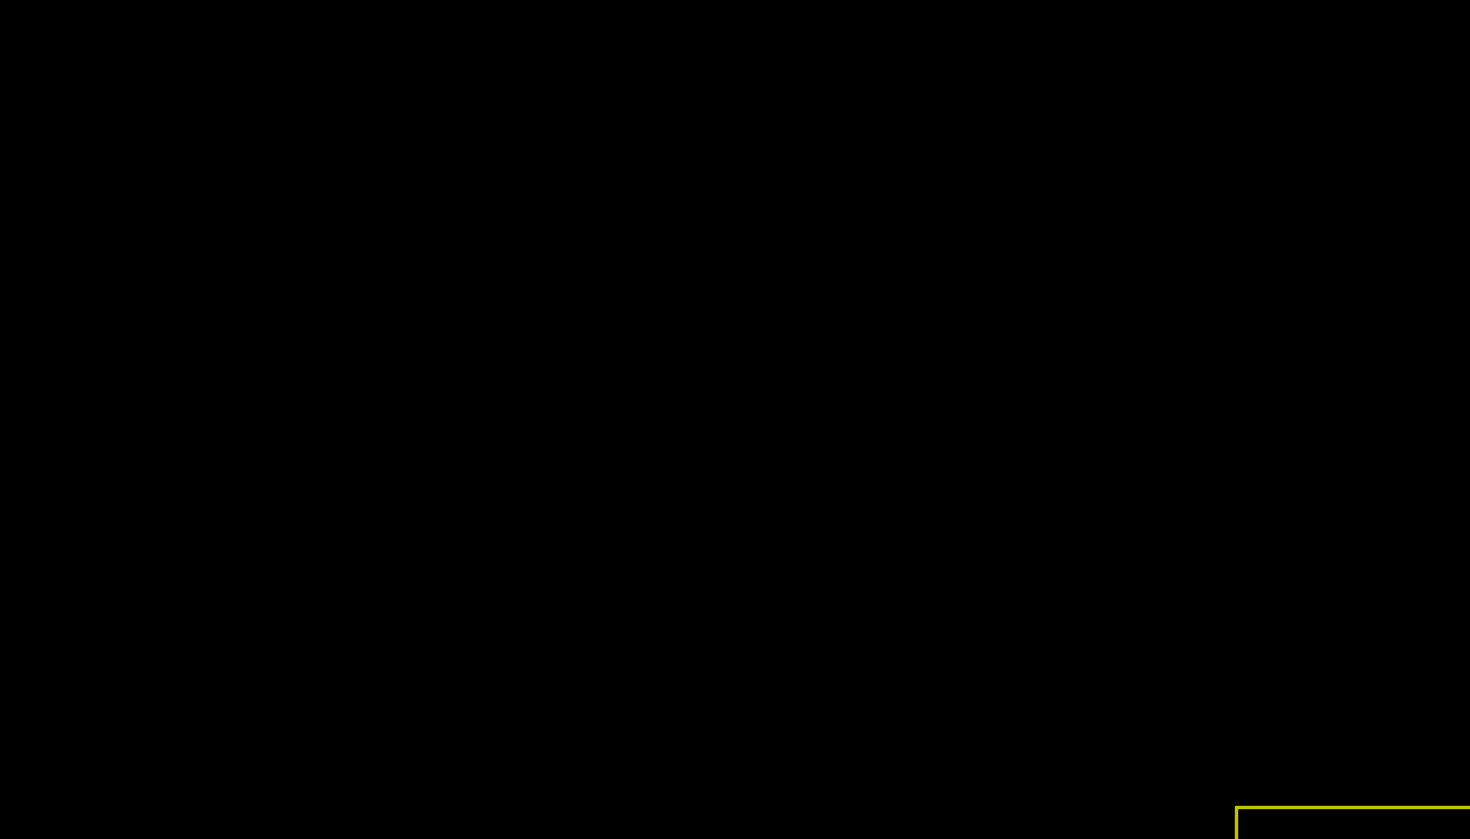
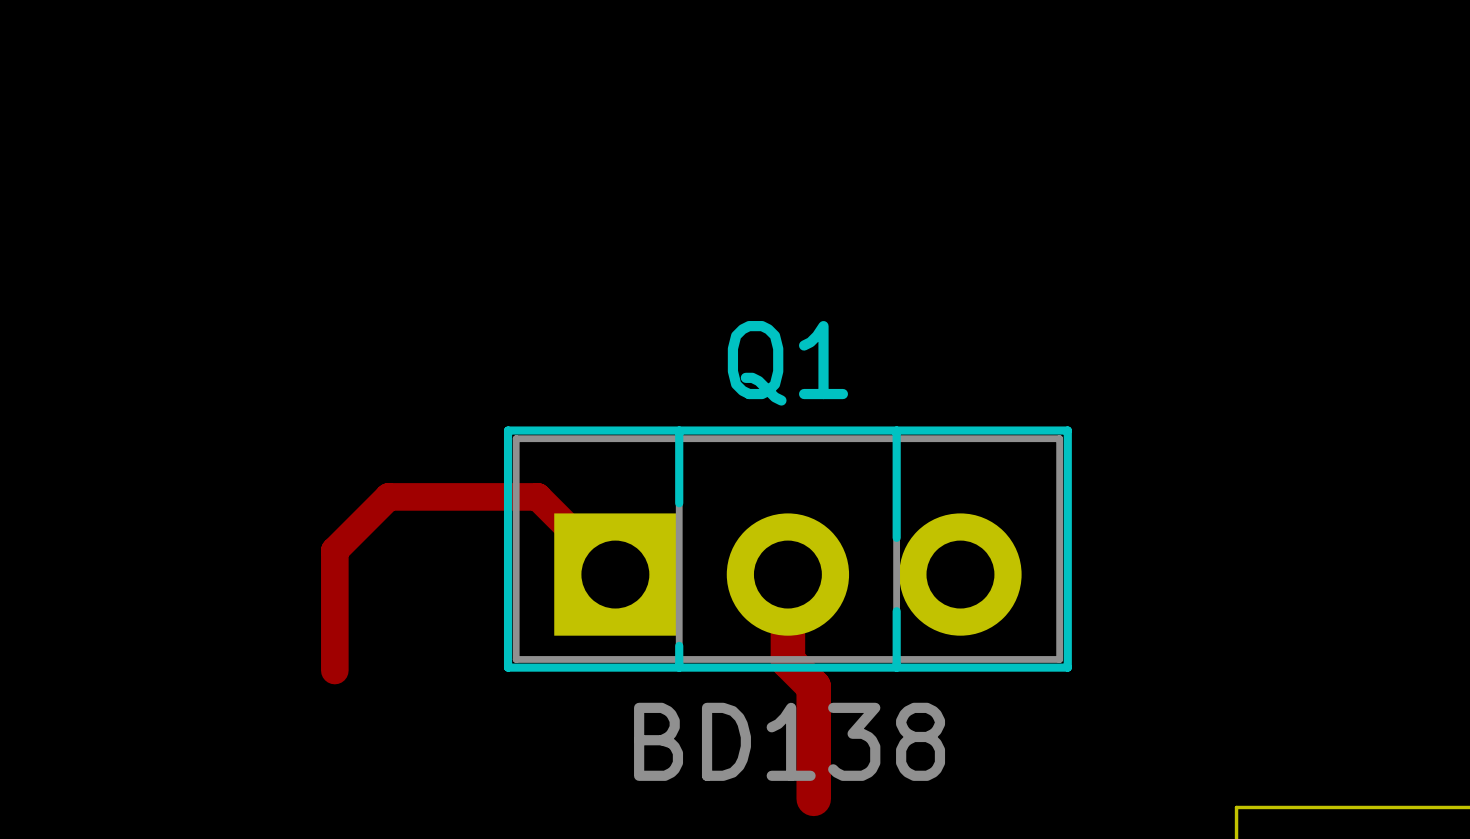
Q1: none -> BD138 (787, 549)
top track: none -> (615, 574) (537, 496) (388, 496) (334, 550) (334, 670)
top track: none -> (787, 574) (787, 661) (813, 686) (813, 798)

